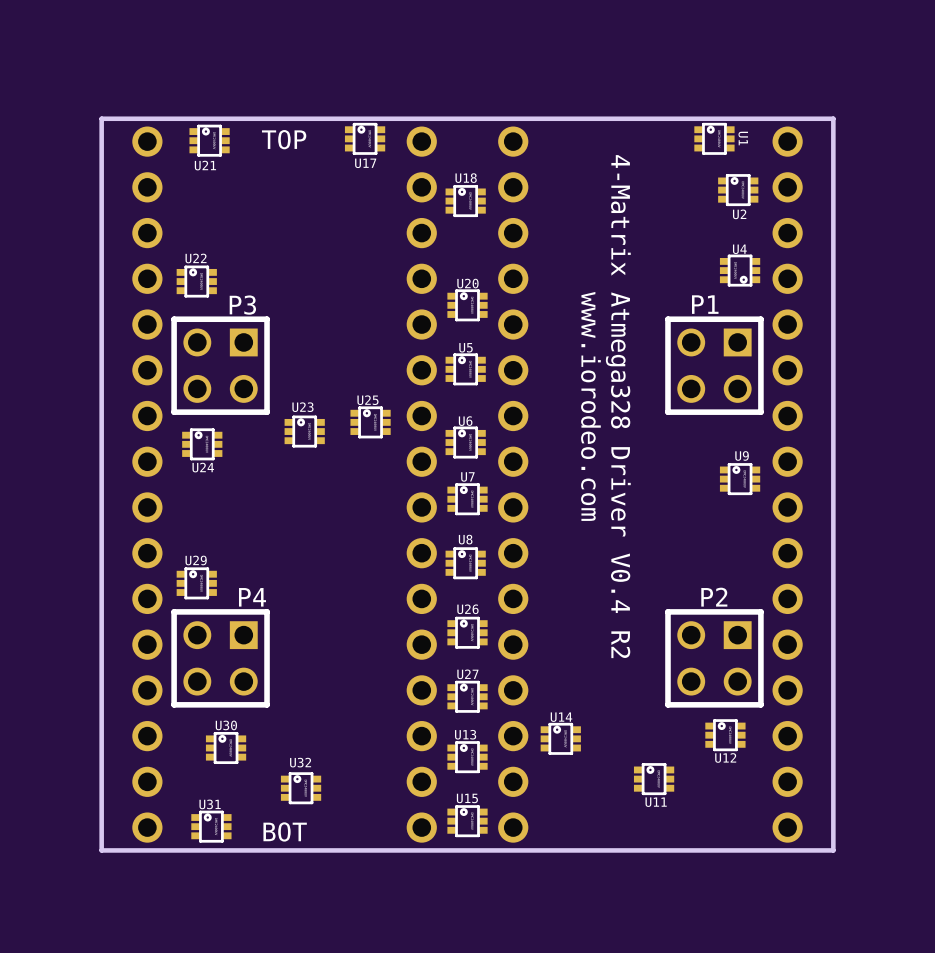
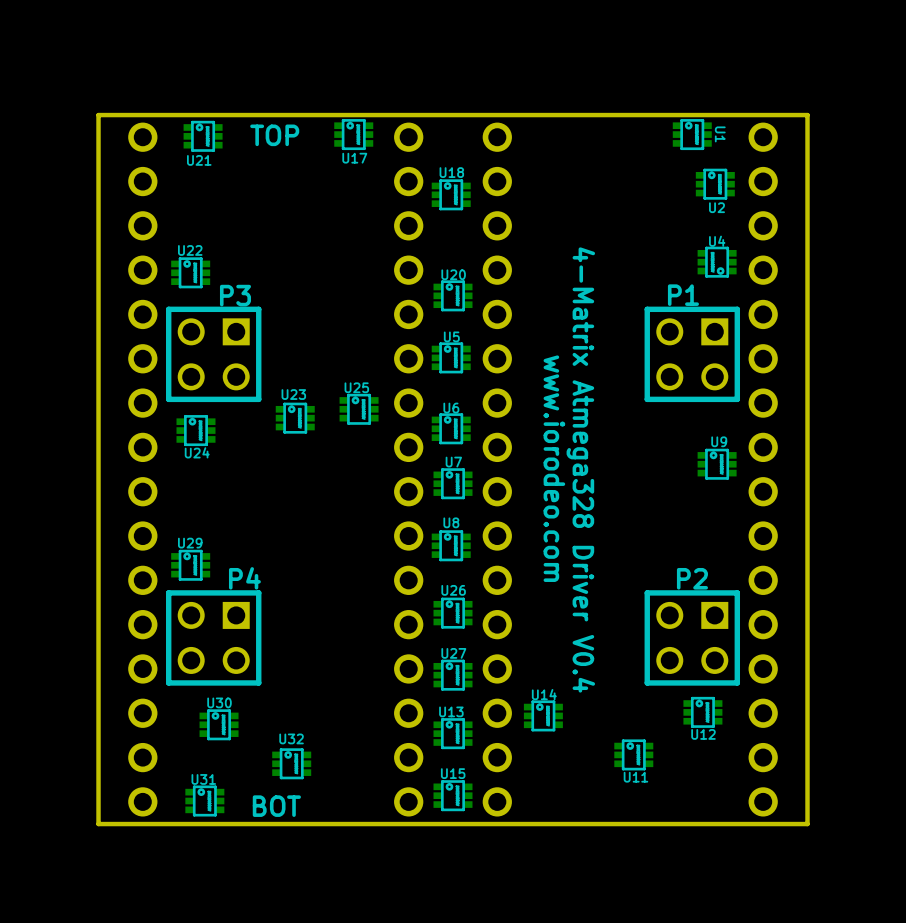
text position: www.iorodeo.com (590, 406) -> www.iorodeo.com (554, 468)
text: 4-Matrix Atmega328 Driver V0.4 R2 (618, 406) -> 4-Matrix Atmega328 Driver V0.4 (580, 469)

